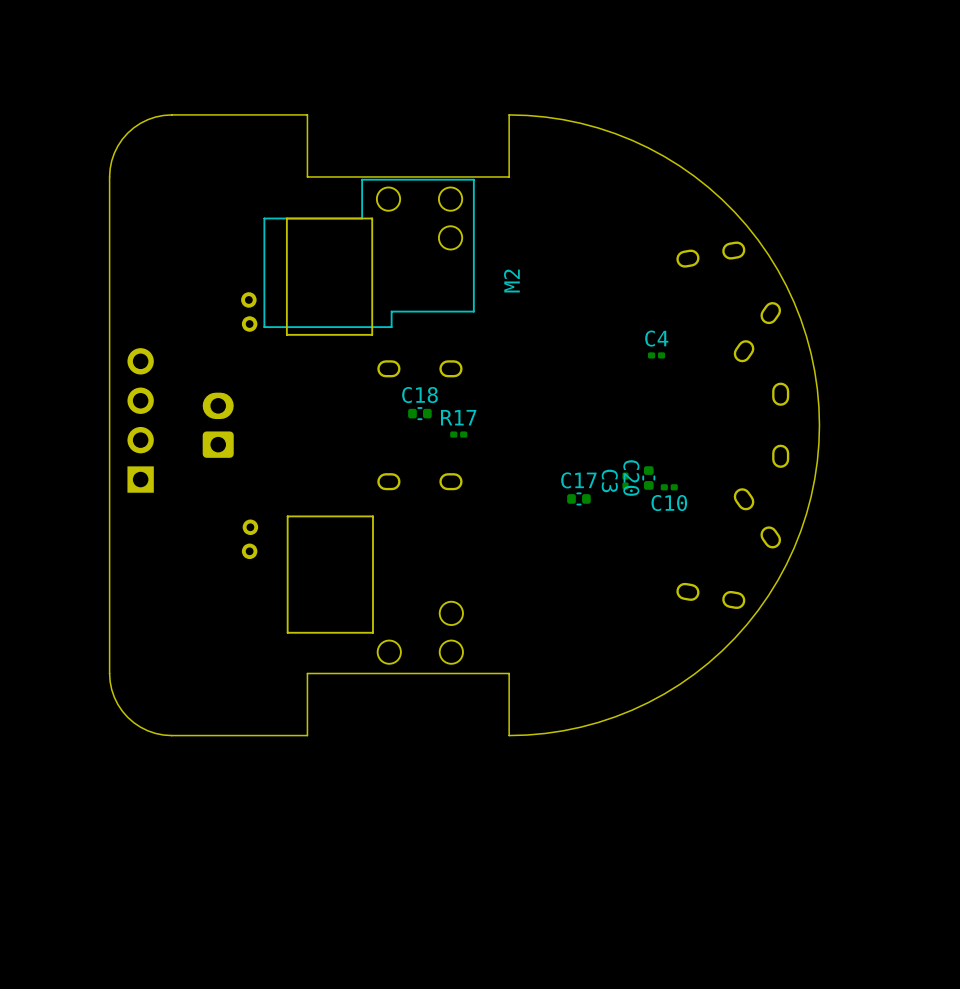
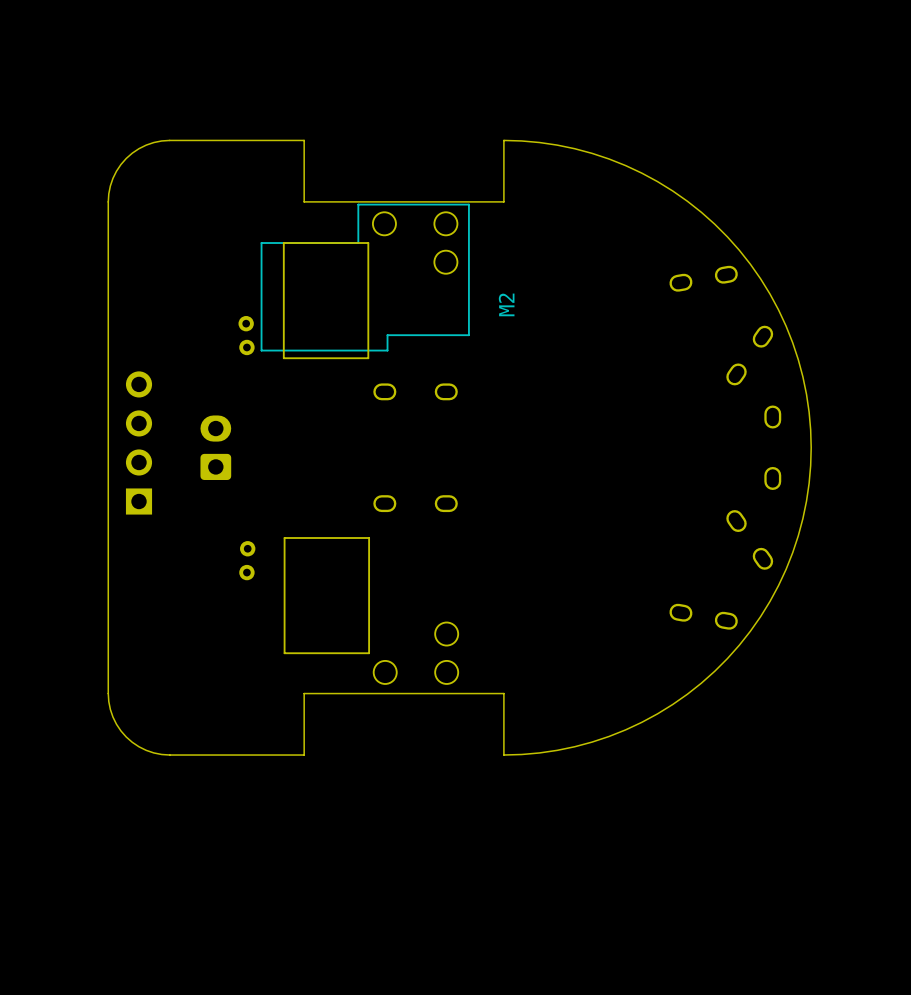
C4: (656, 355) -> none
C18: (419, 413) -> none
R17: (458, 434) -> none
C20: (648, 478) -> none
C3: (625, 481) -> none
C10: (669, 487) -> none
C17: (578, 498) -> none

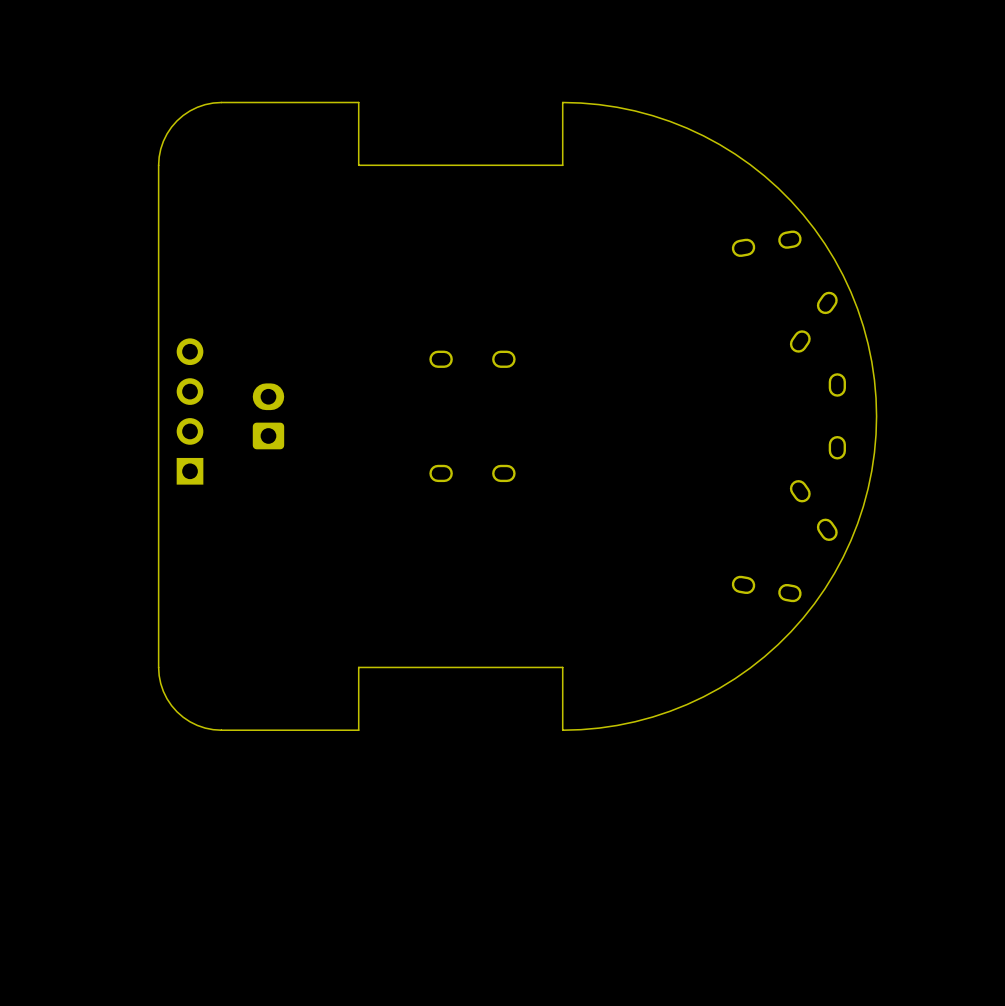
M2: (354, 281) -> none
part: (349, 610) -> none

